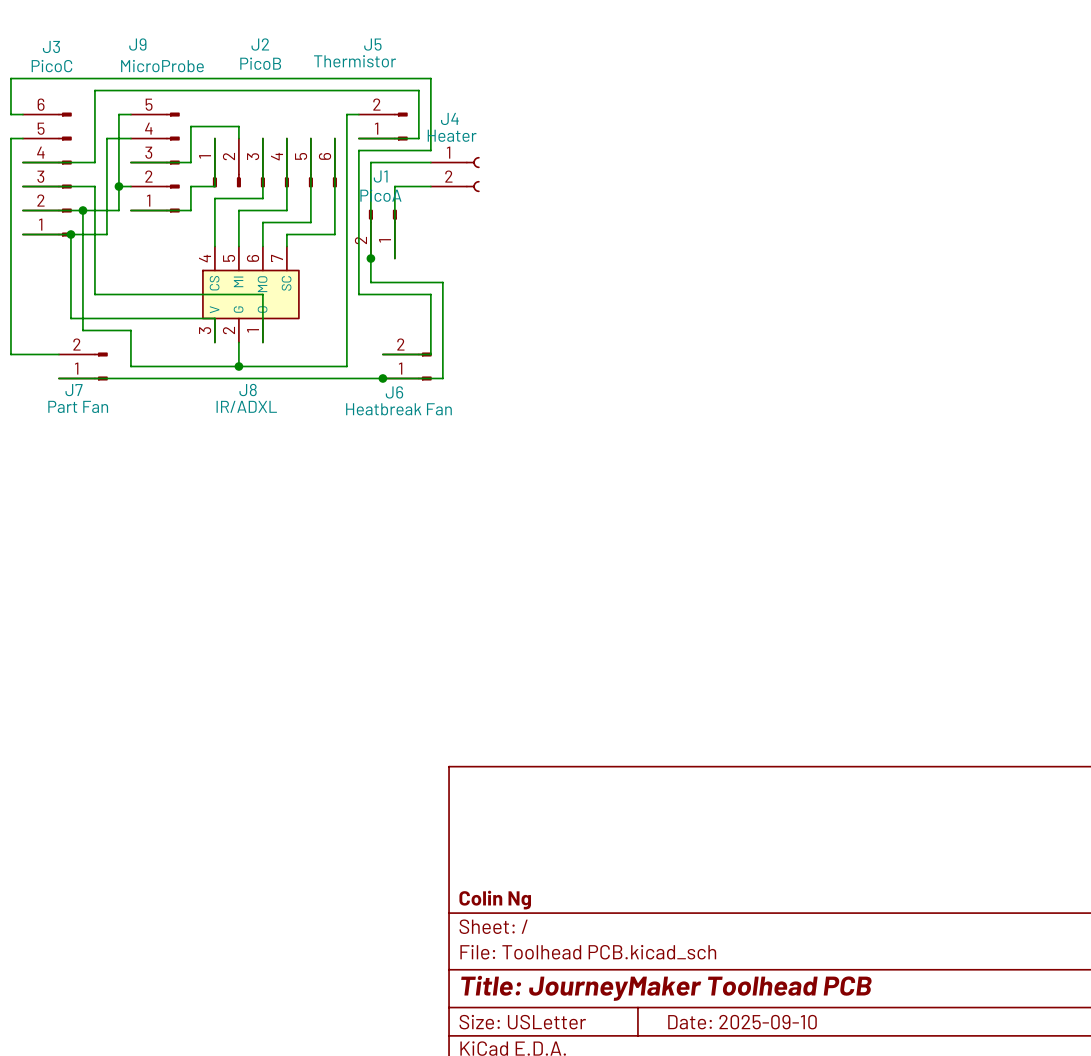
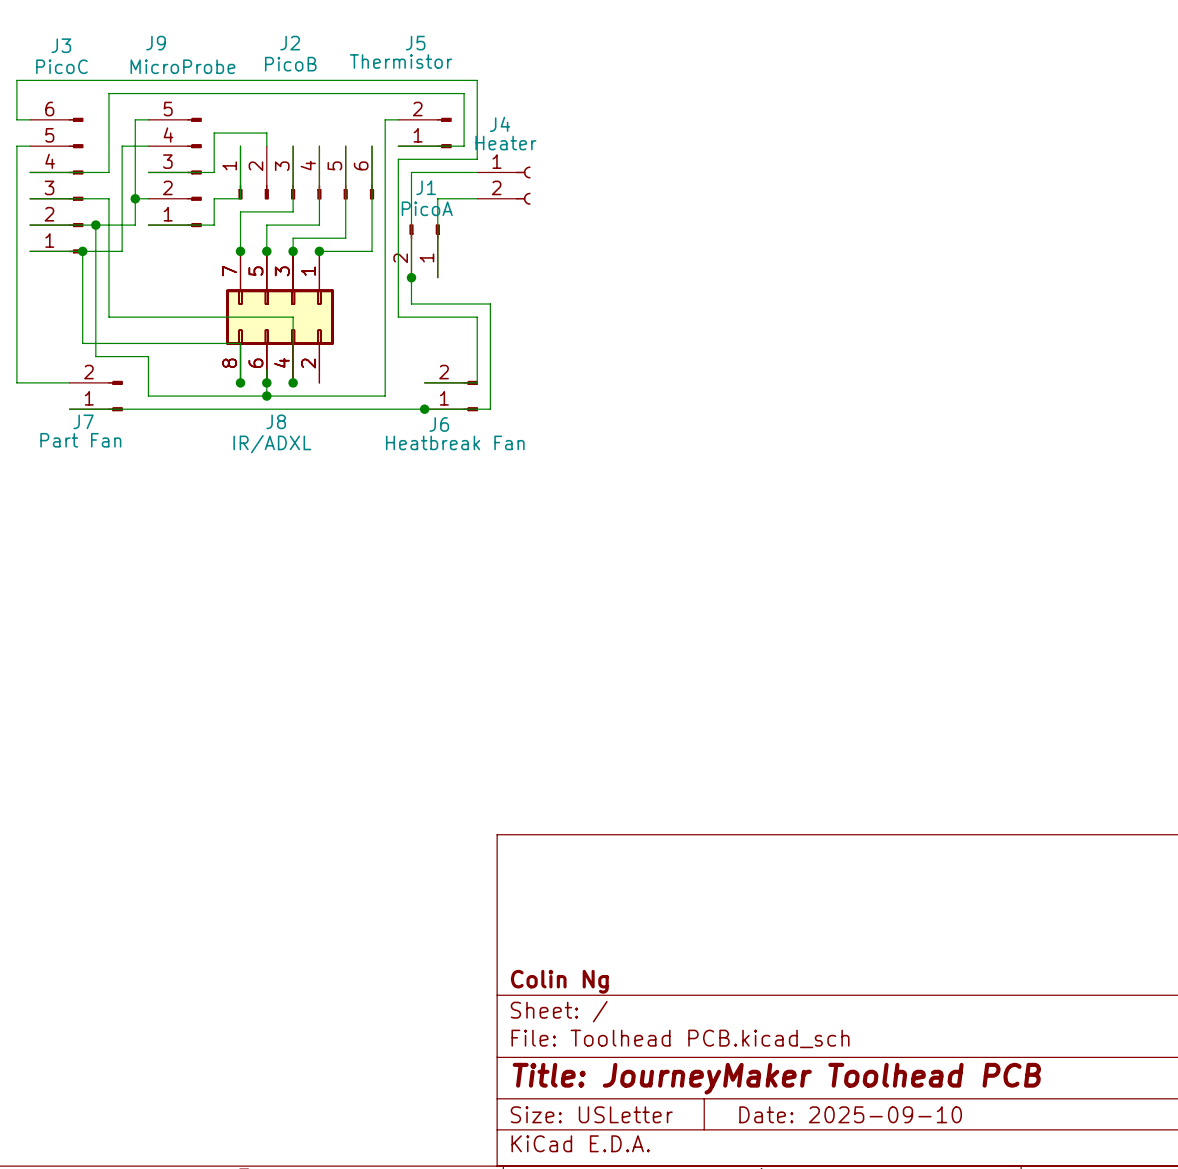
junction: none -> (240, 251)
junction: none -> (266, 251)
junction: none -> (293, 251)
junction: none -> (319, 251)
J8 symbol: [202, 246, 299, 343] -> [226, 251, 334, 383]
part: none -> (279, 317)
junction: none -> (240, 382)
junction: none -> (266, 382)
junction: none -> (293, 382)

